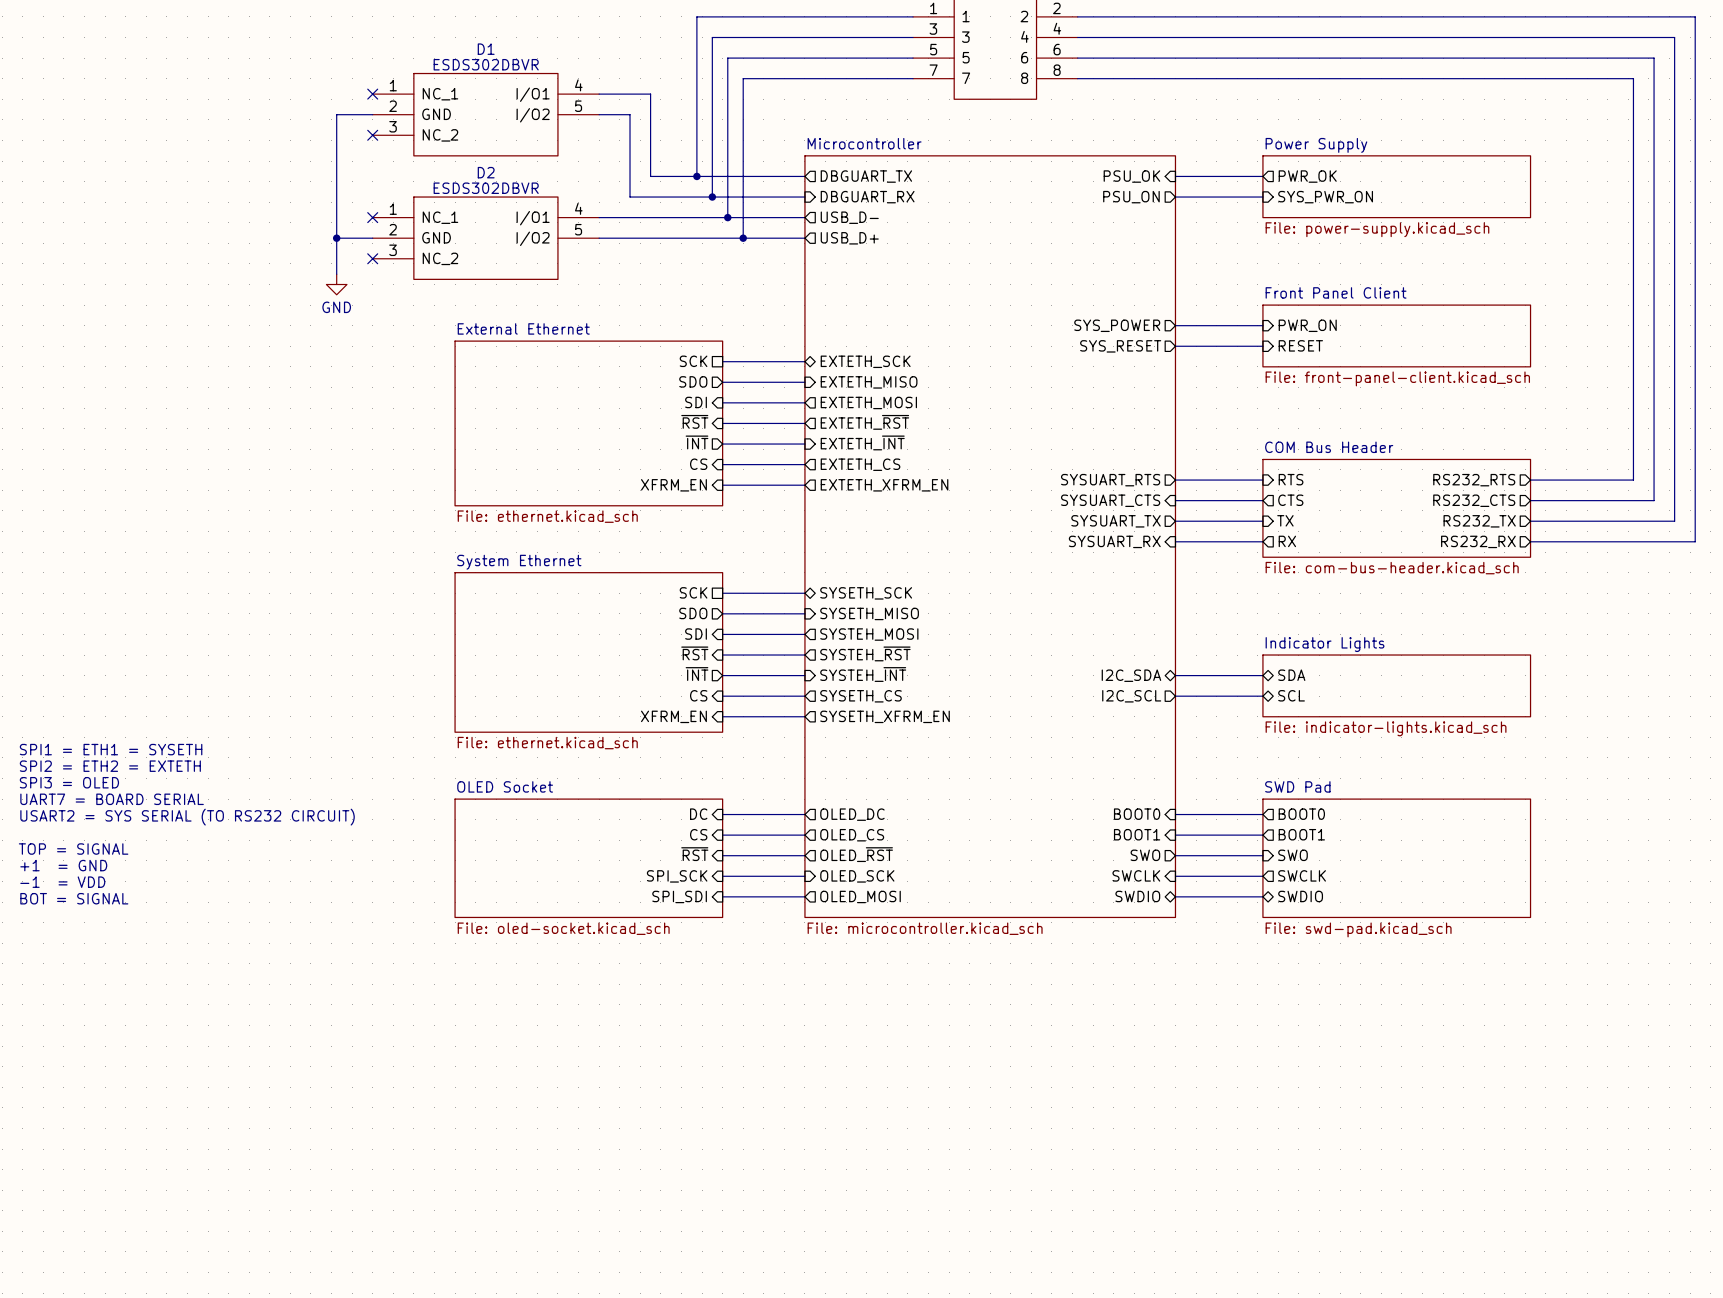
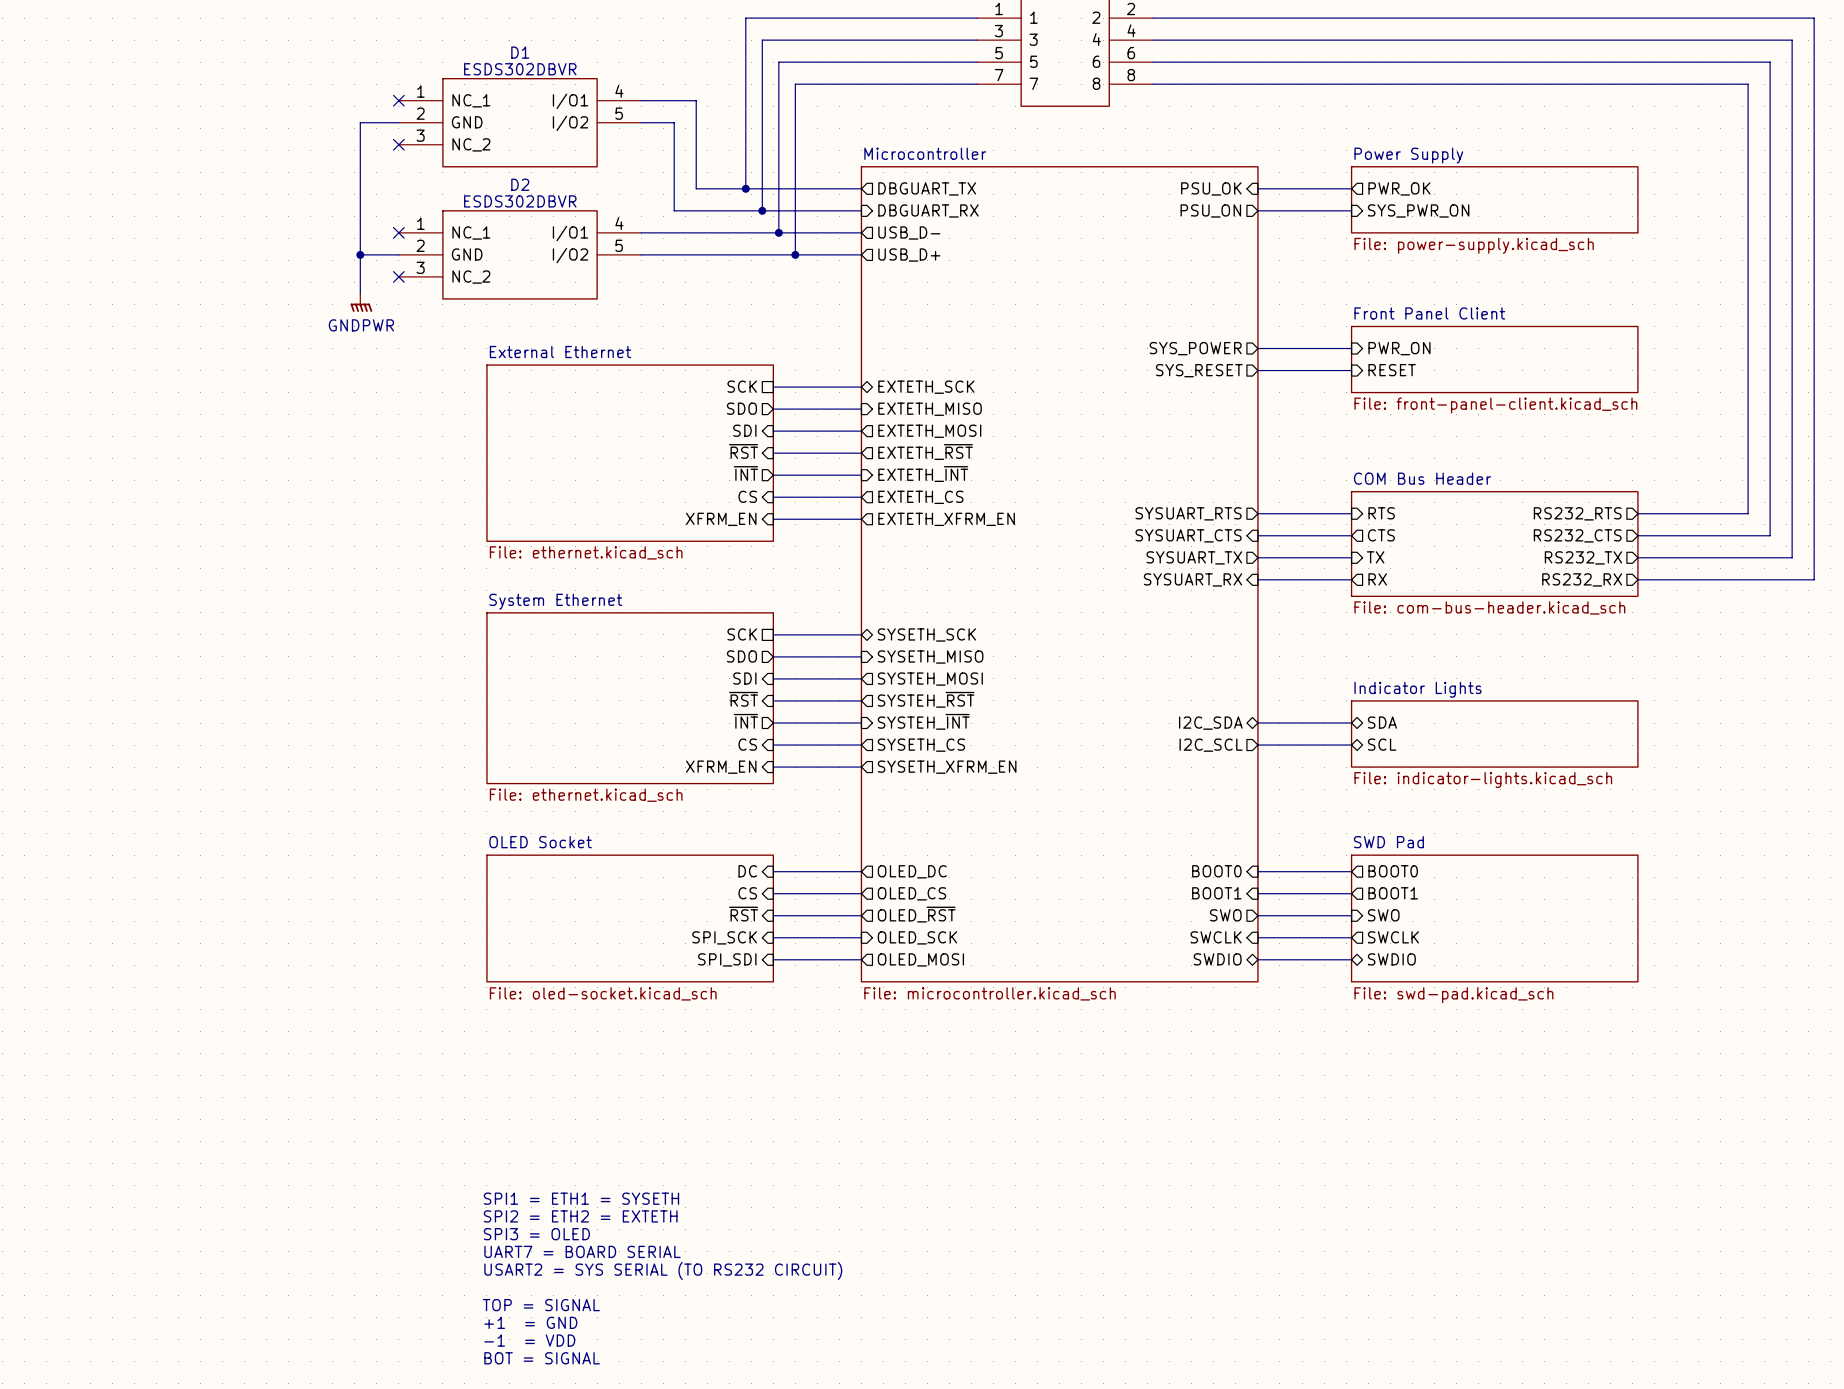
power symbol: GND (336, 284) -> GNDPWR (361, 302)
text: SPI1 = ETH1 = SYSETH (111, 749) -> none
text: SPI2 = ETH2 = EXTETH (110, 766) -> none
text: SPI3 = OLED (69, 782) -> none
text: UART7 = BOARD SERIAL (112, 799) -> none
text: USART2 = SYS SERIAL (TO RS232 CIRCUIT) (187, 817) -> none
text: TOP = SIGNAL (73, 849) -> none
text: +1 = GND (63, 865) -> none
text: -1 = VDD (62, 882) -> none
text: BOT = SIGNAL (74, 898) -> none
text: none -> SPI1 = ETH1 = SYSETH (581, 1198)
text: none -> SPI2 = ETH2 = EXTETH (580, 1216)
text: none -> SPI3 = OLED (536, 1234)
text: none -> UART7 = BOARD SERIAL (582, 1251)
text: none -> USART2 = SYS SERIAL (TO RS232 CIRCUIT) (663, 1270)
text: none -> TOP = SIGNAL (541, 1305)
text: none -> +1 = GND (530, 1322)
text: none -> -1 = VDD (529, 1340)
text: none -> BOT = SIGNAL (542, 1358)

